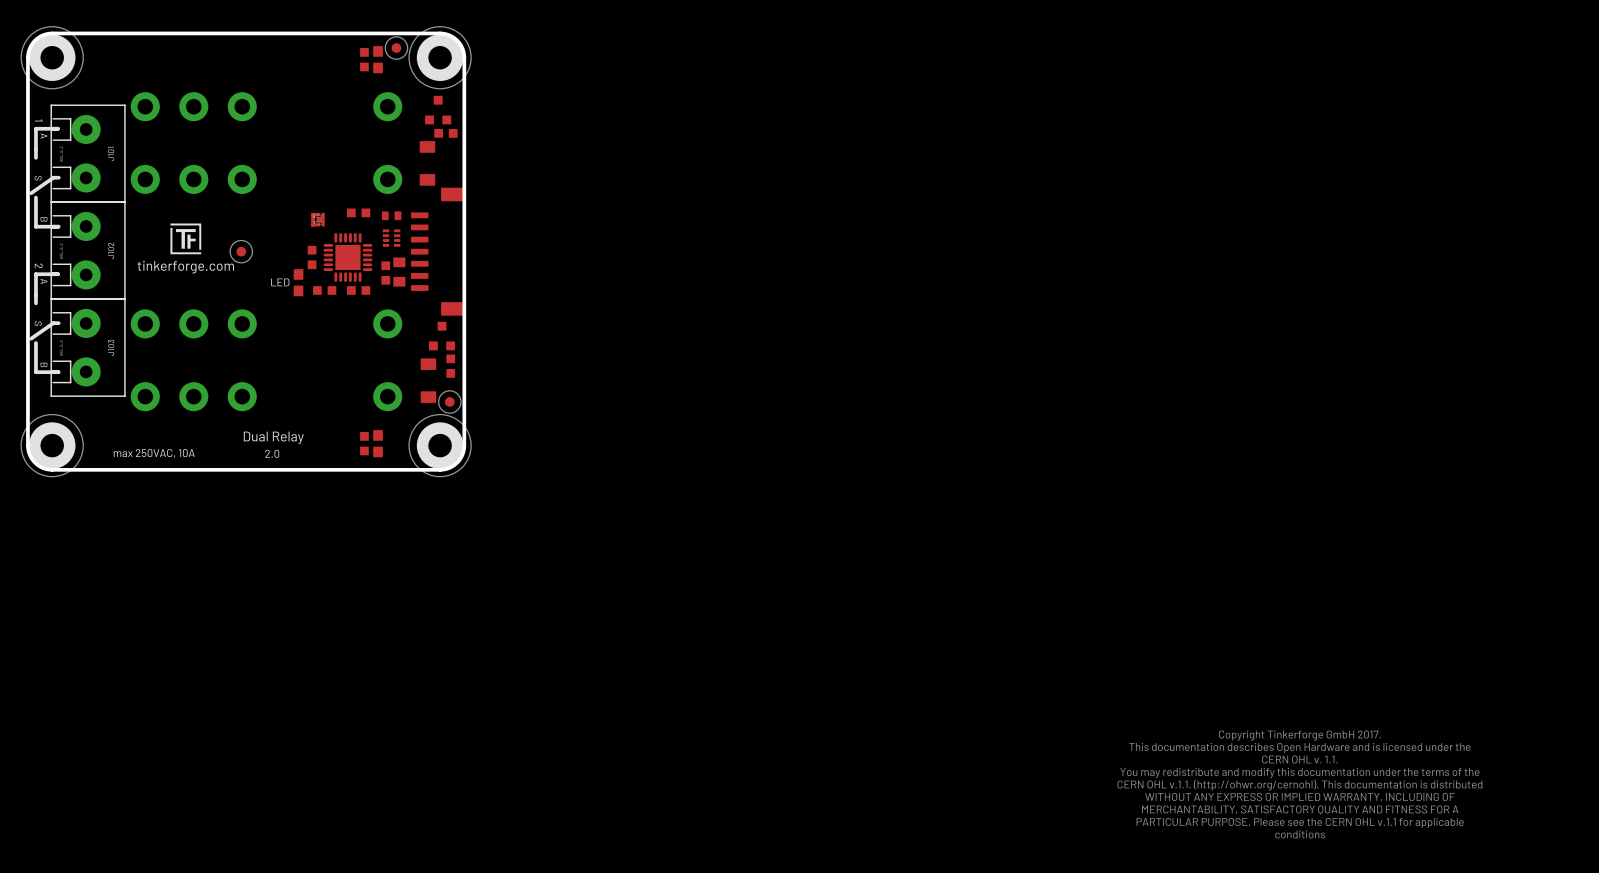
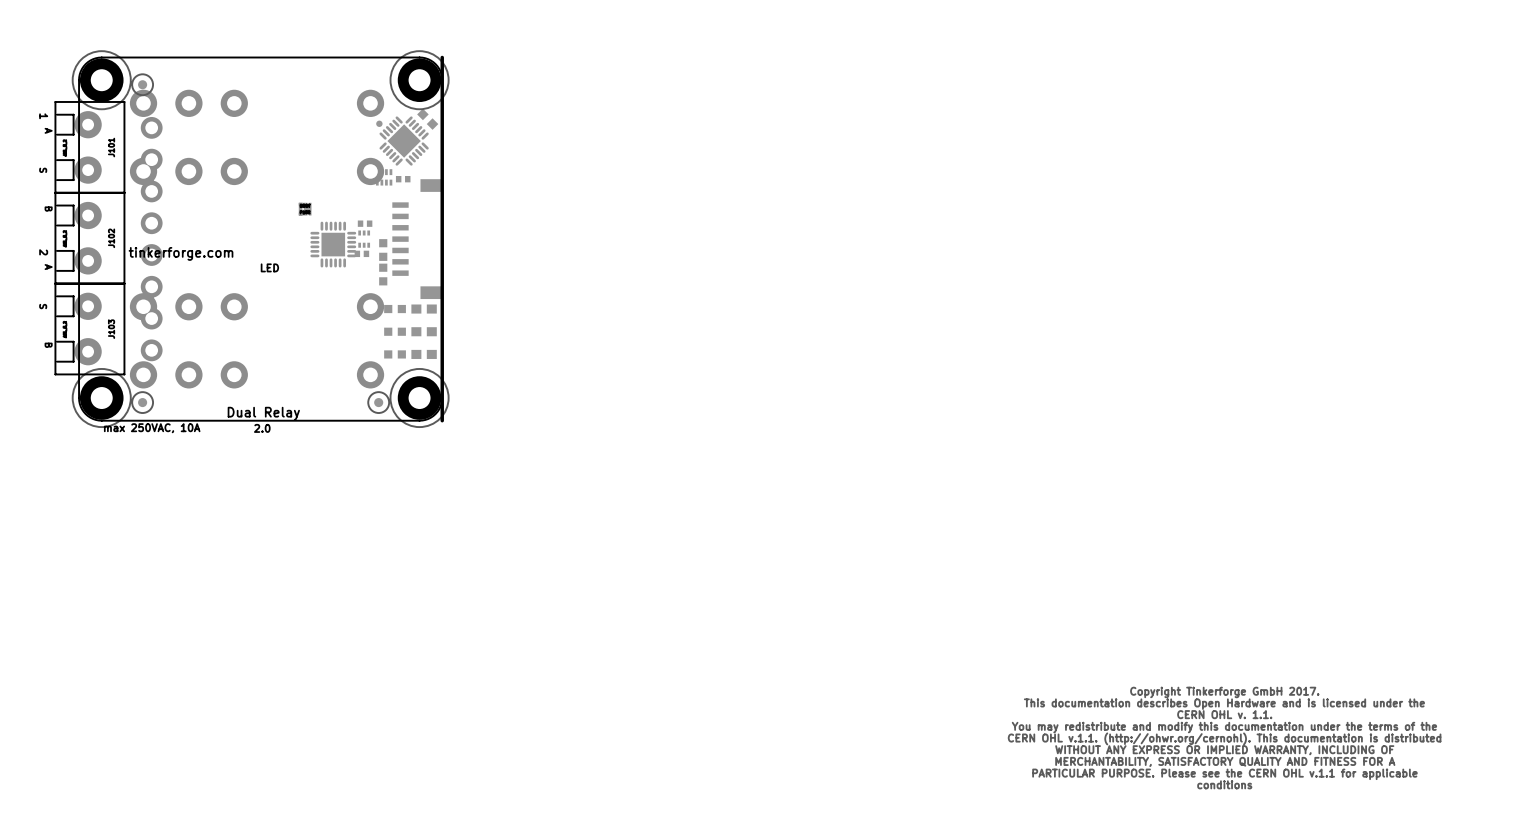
part: (396, 48) -> none
part position: (52, 57) -> (101, 80)
part position: (440, 57) -> (419, 80)
board edge: (464, 57) (462, 48) (457, 40) (449, 35) (440, 33) (52, 33) (42, 35) (35, 40) (29, 48) (27, 57) (27, 445) (29, 454) (35, 462) (42, 467) (52, 469) (440, 469) (449, 467) (457, 462) (462, 454) (464, 445) -> none
part: (364, 59) -> none
part: (378, 59) -> none
board edge: none -> (442, 80) (440, 71) (435, 64) (428, 59) (419, 57) (98, 57) (85, 64) (80, 71) (79, 80) (79, 398) (80, 406) (87, 416) (101, 420) (419, 420) (428, 418) (435, 414) (440, 406) (442, 398)
part: none -> (142, 84)
part: (438, 110) -> none
part: none -> (427, 119)
line: (58, 128) (35, 128) (35, 157) -> none
part: none -> (379, 123)
part: (445, 133) -> none
part: none -> (404, 141)
part: (427, 163) -> none
line: (58, 177) (53, 177) (31, 193) -> none
part: none -> (403, 179)
line: (35, 197) (35, 226) (58, 226) -> none
part: (358, 212) -> none
part: (391, 215) -> none
drawing: [170, 223, 202, 255] -> none
part: none -> (365, 223)
part rotation: 0° (391, 238) -> 90° clockwise (384, 177)
part position: (391, 238) -> (384, 177)
part: none -> (151, 239)
part: (241, 251) -> none
part: none -> (364, 239)
part: (312, 257) -> none
part: none -> (383, 250)
part: none -> (361, 253)
part: (399, 272) -> none
part: (385, 273) -> none
line: (58, 274) (35, 274) (35, 303) -> none
part: (298, 282) -> none
part: none -> (383, 274)
part: (324, 290) -> none
part: (358, 290) -> none
line: (58, 323) (53, 323) (31, 338) -> none
part: none -> (395, 309)
part: none -> (424, 309)
part: (442, 336) -> none
line: (35, 343) (35, 372) (58, 372) -> none
part: none -> (395, 331)
part: none -> (424, 331)
part: (450, 366) -> none
part: none -> (395, 354)
part: none -> (424, 354)
part: (428, 380) -> none
part position: (449, 401) -> (378, 402)
part: none -> (142, 402)
part: (364, 443) -> none
part: (378, 443) -> none
part position: (52, 445) -> (101, 398)
part position: (440, 445) -> (419, 398)

